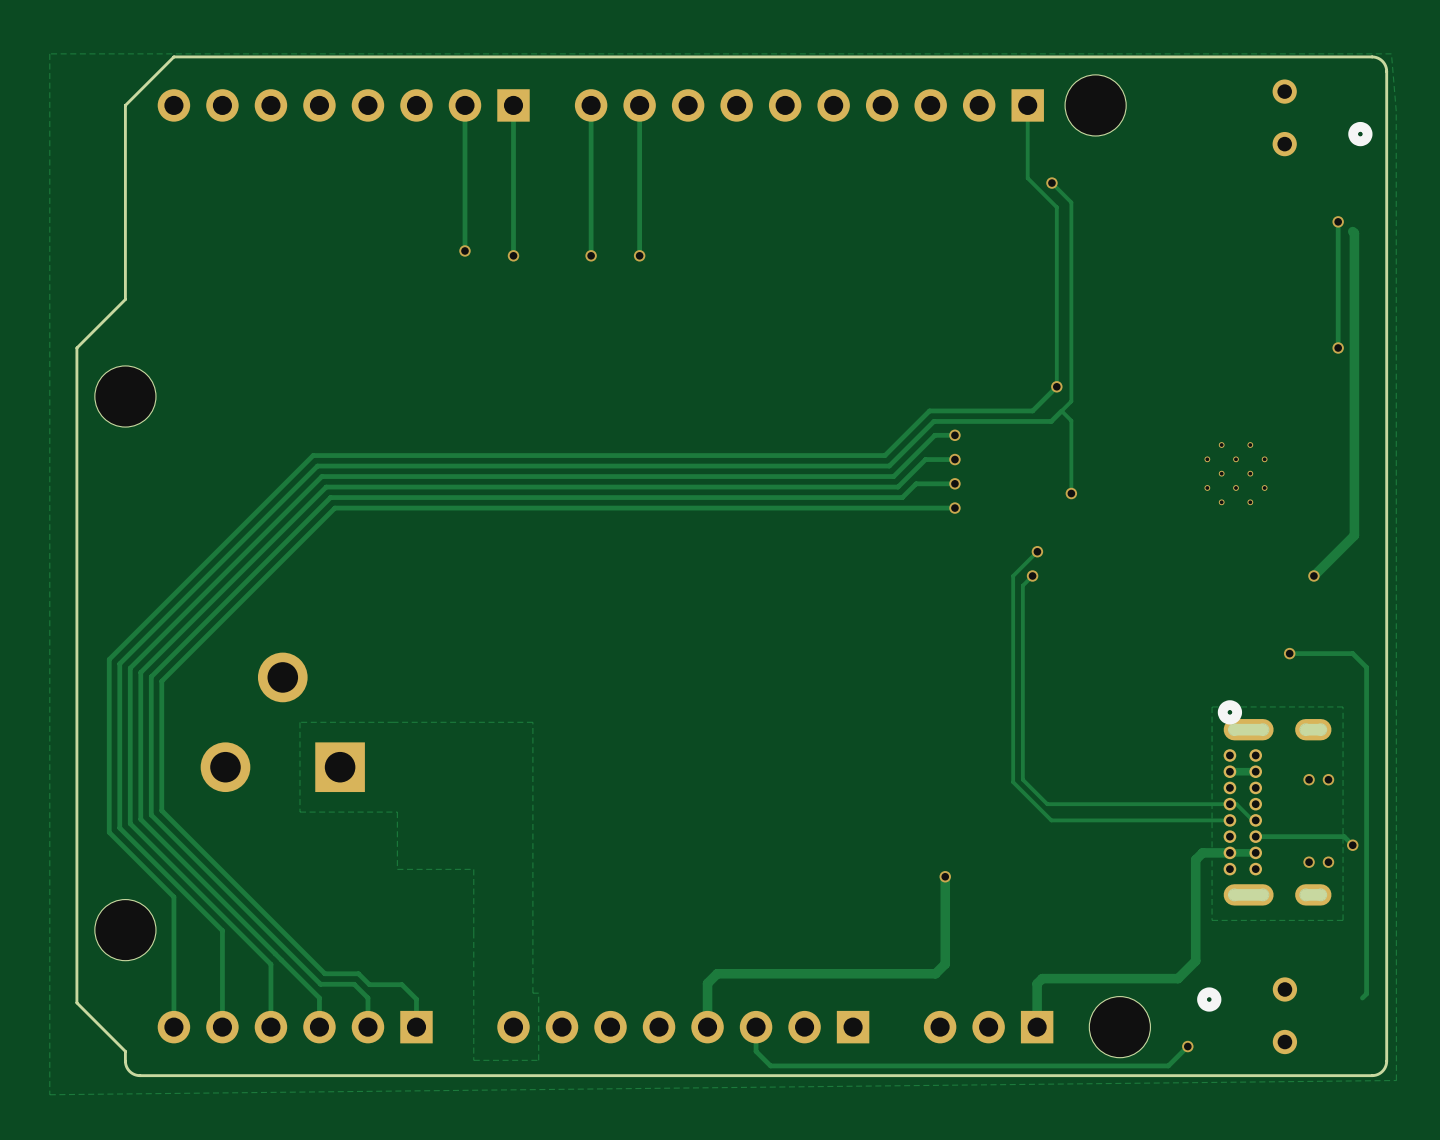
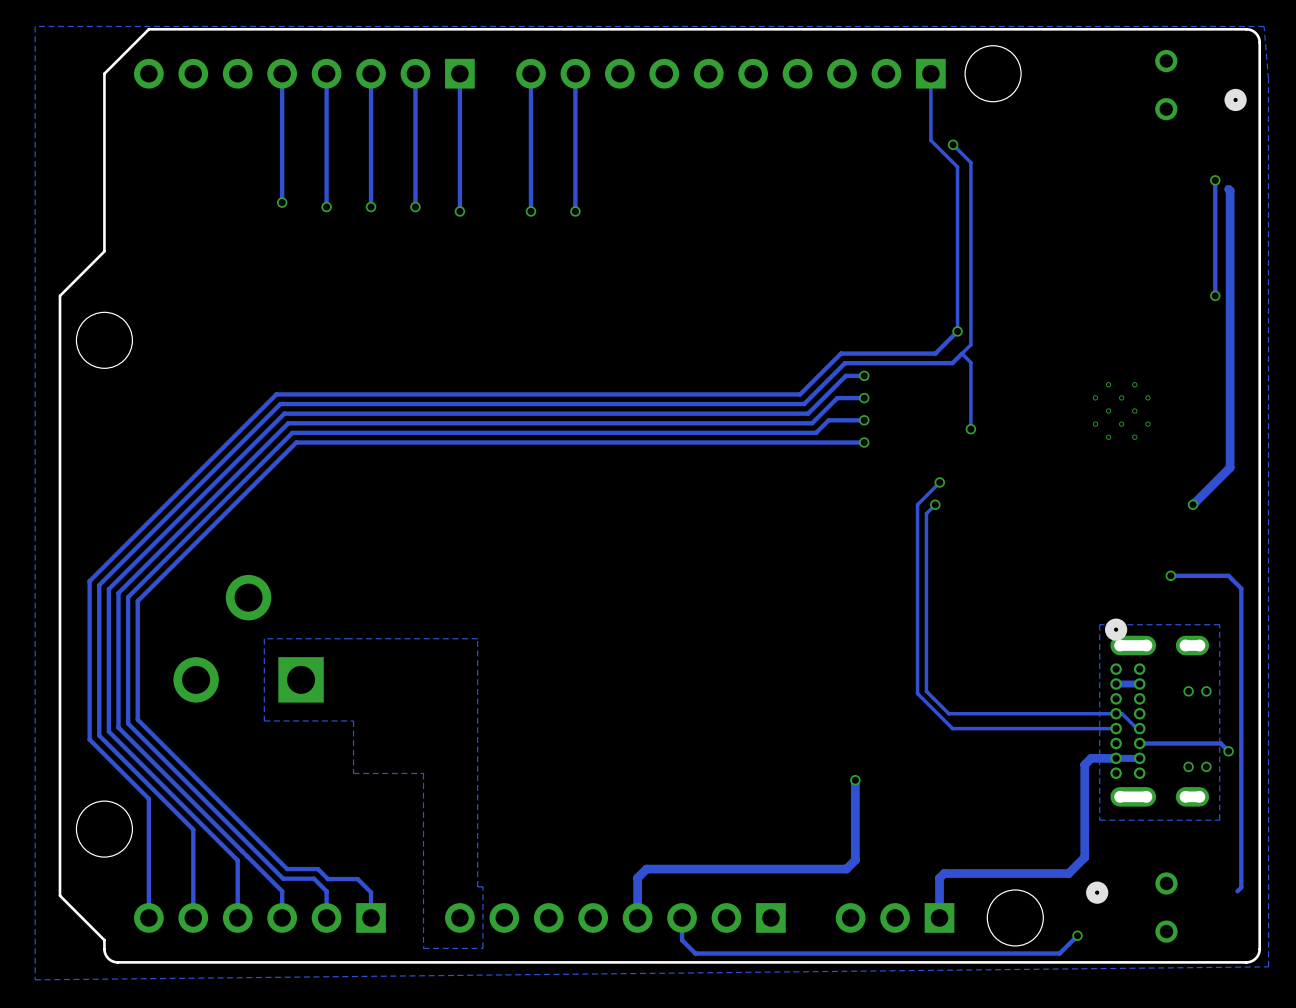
track: none -> (282, 73) (282, 202)
track: none -> (326, 73) (326, 207)
track: none -> (371, 73) (371, 207)
via: none -> (282, 202)
via: none -> (326, 207)
via: none -> (371, 207)

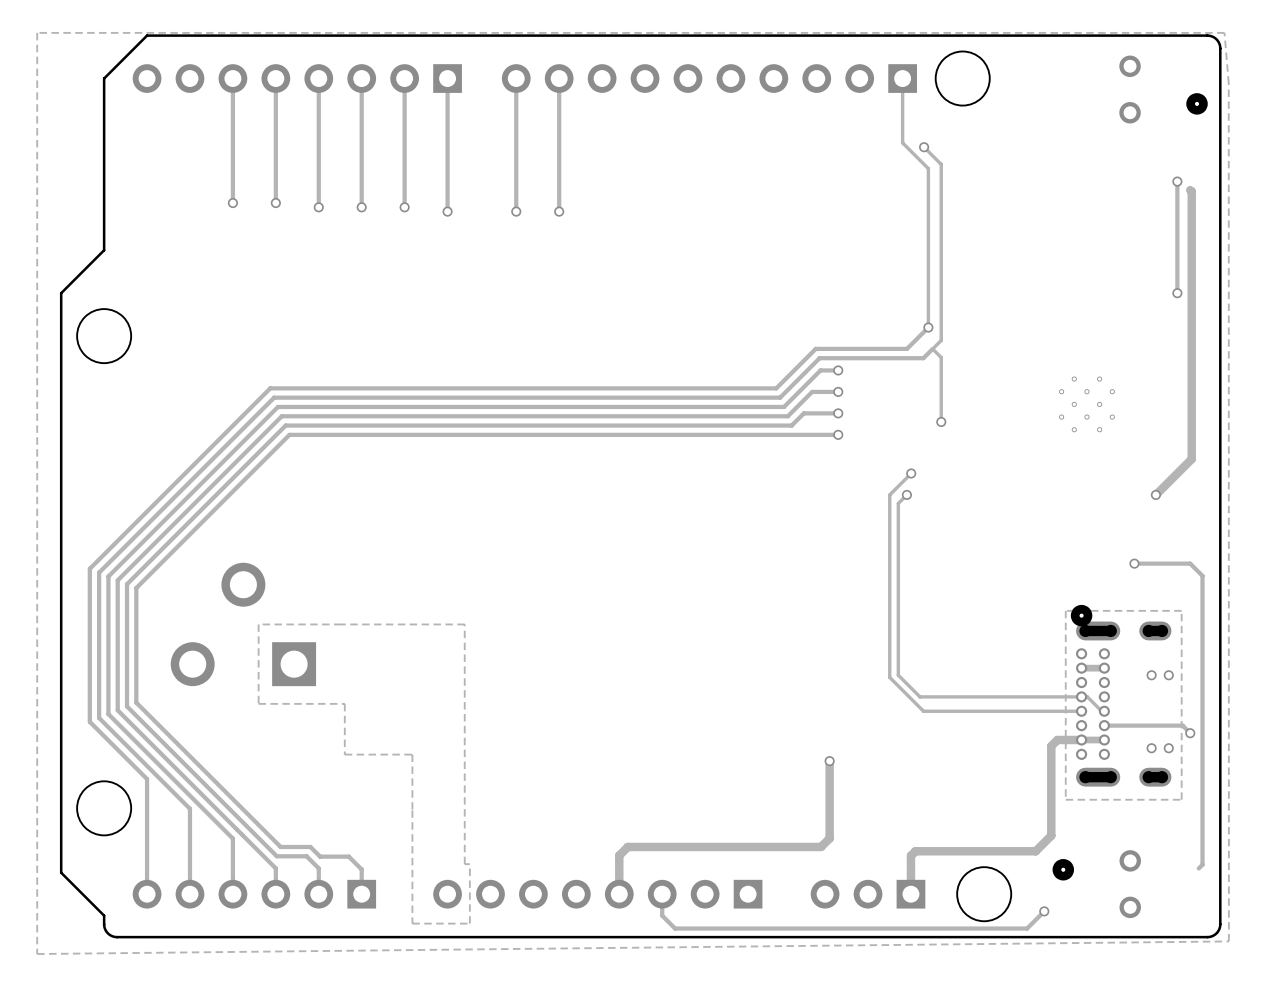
track: none -> (232, 78) (232, 203)
via: none -> (232, 203)

